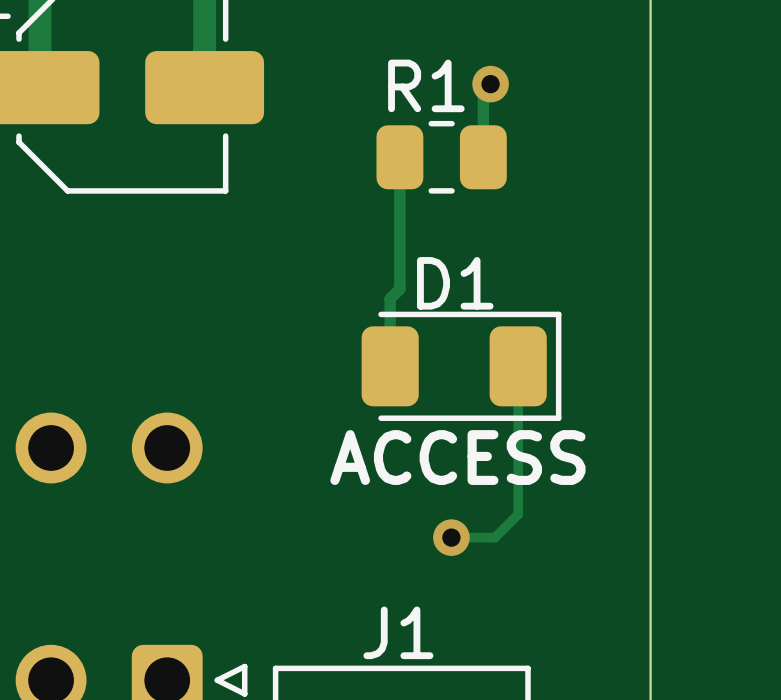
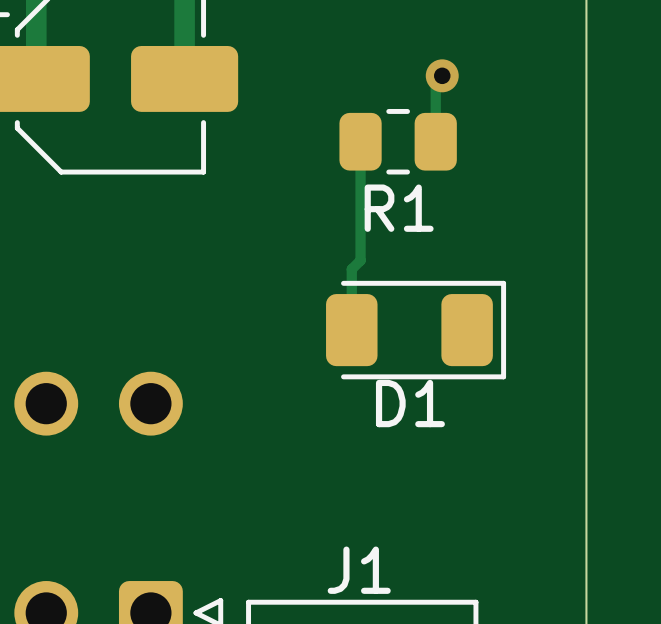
R1 name position: R1 (426, 85) -> R1 (399, 208)
D1 name position: D1 (455, 283) -> D1 (410, 403)
track: (518, 366) (518, 514) (494, 537) (451, 537) -> none
text: ACCESS (457, 457) -> none
via: (451, 537) -> none

